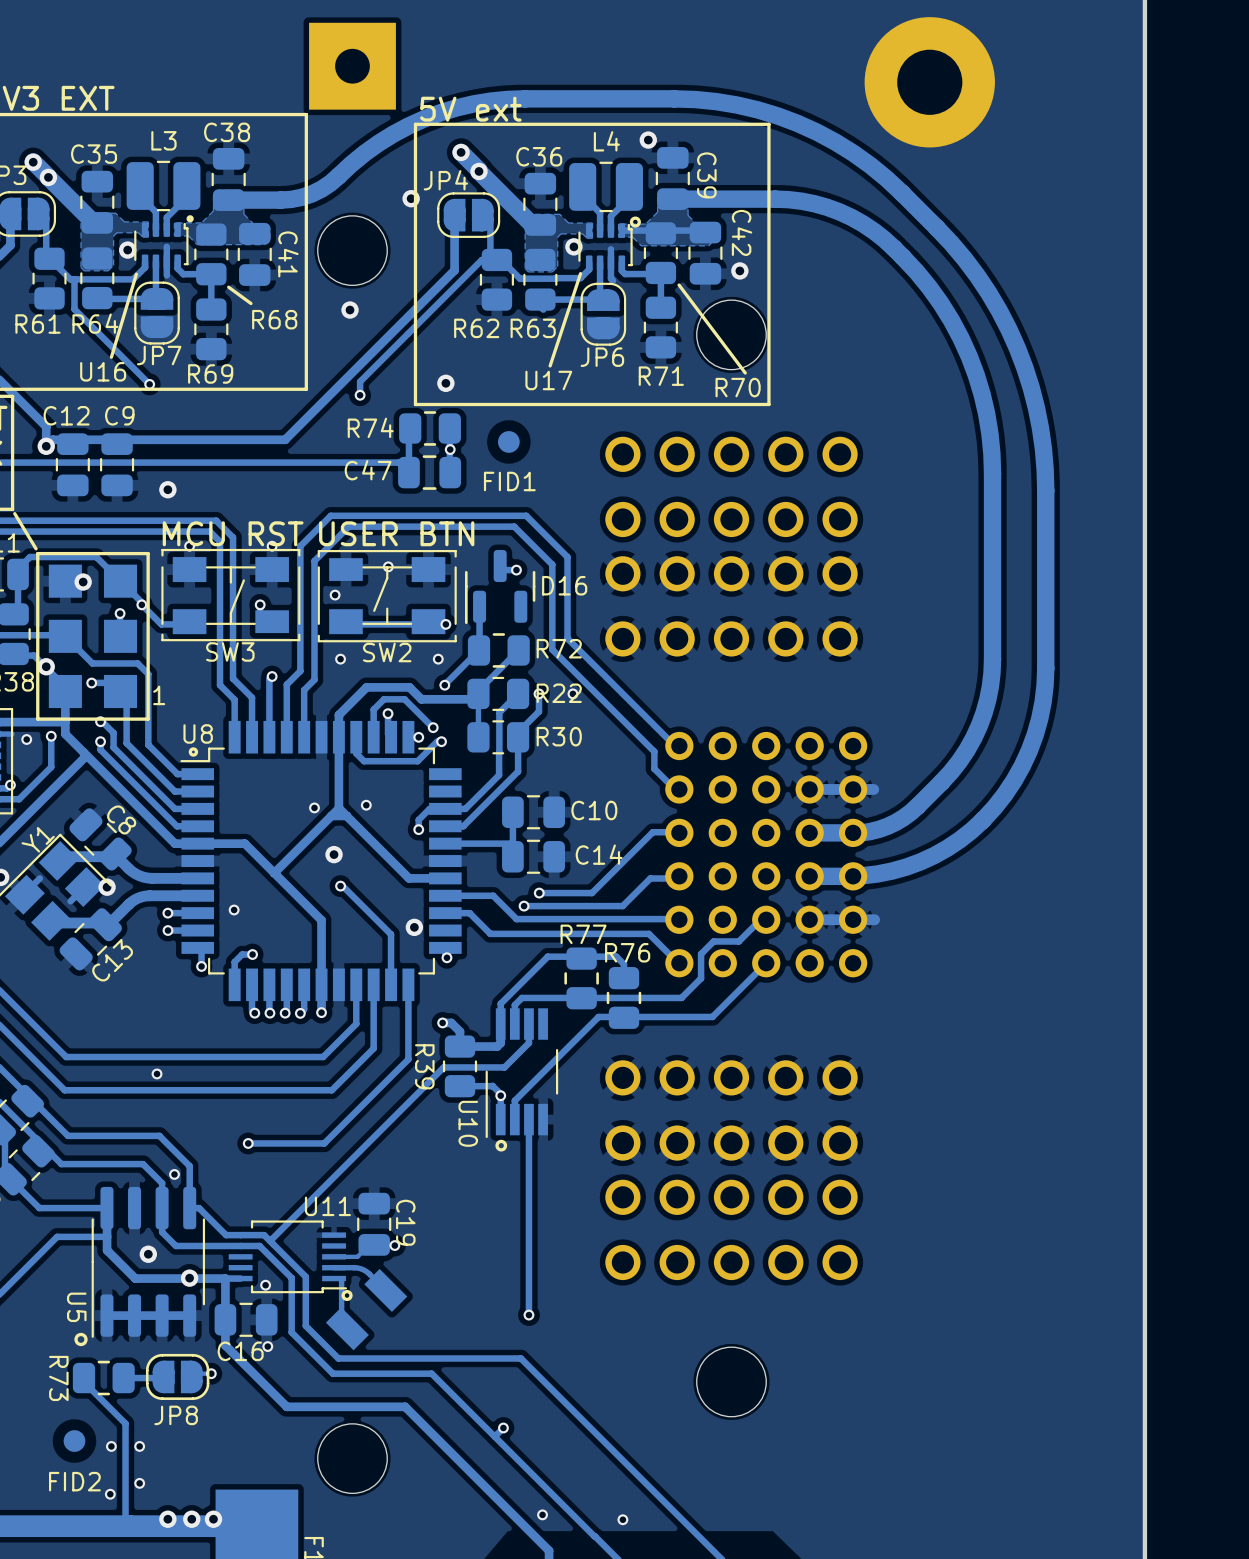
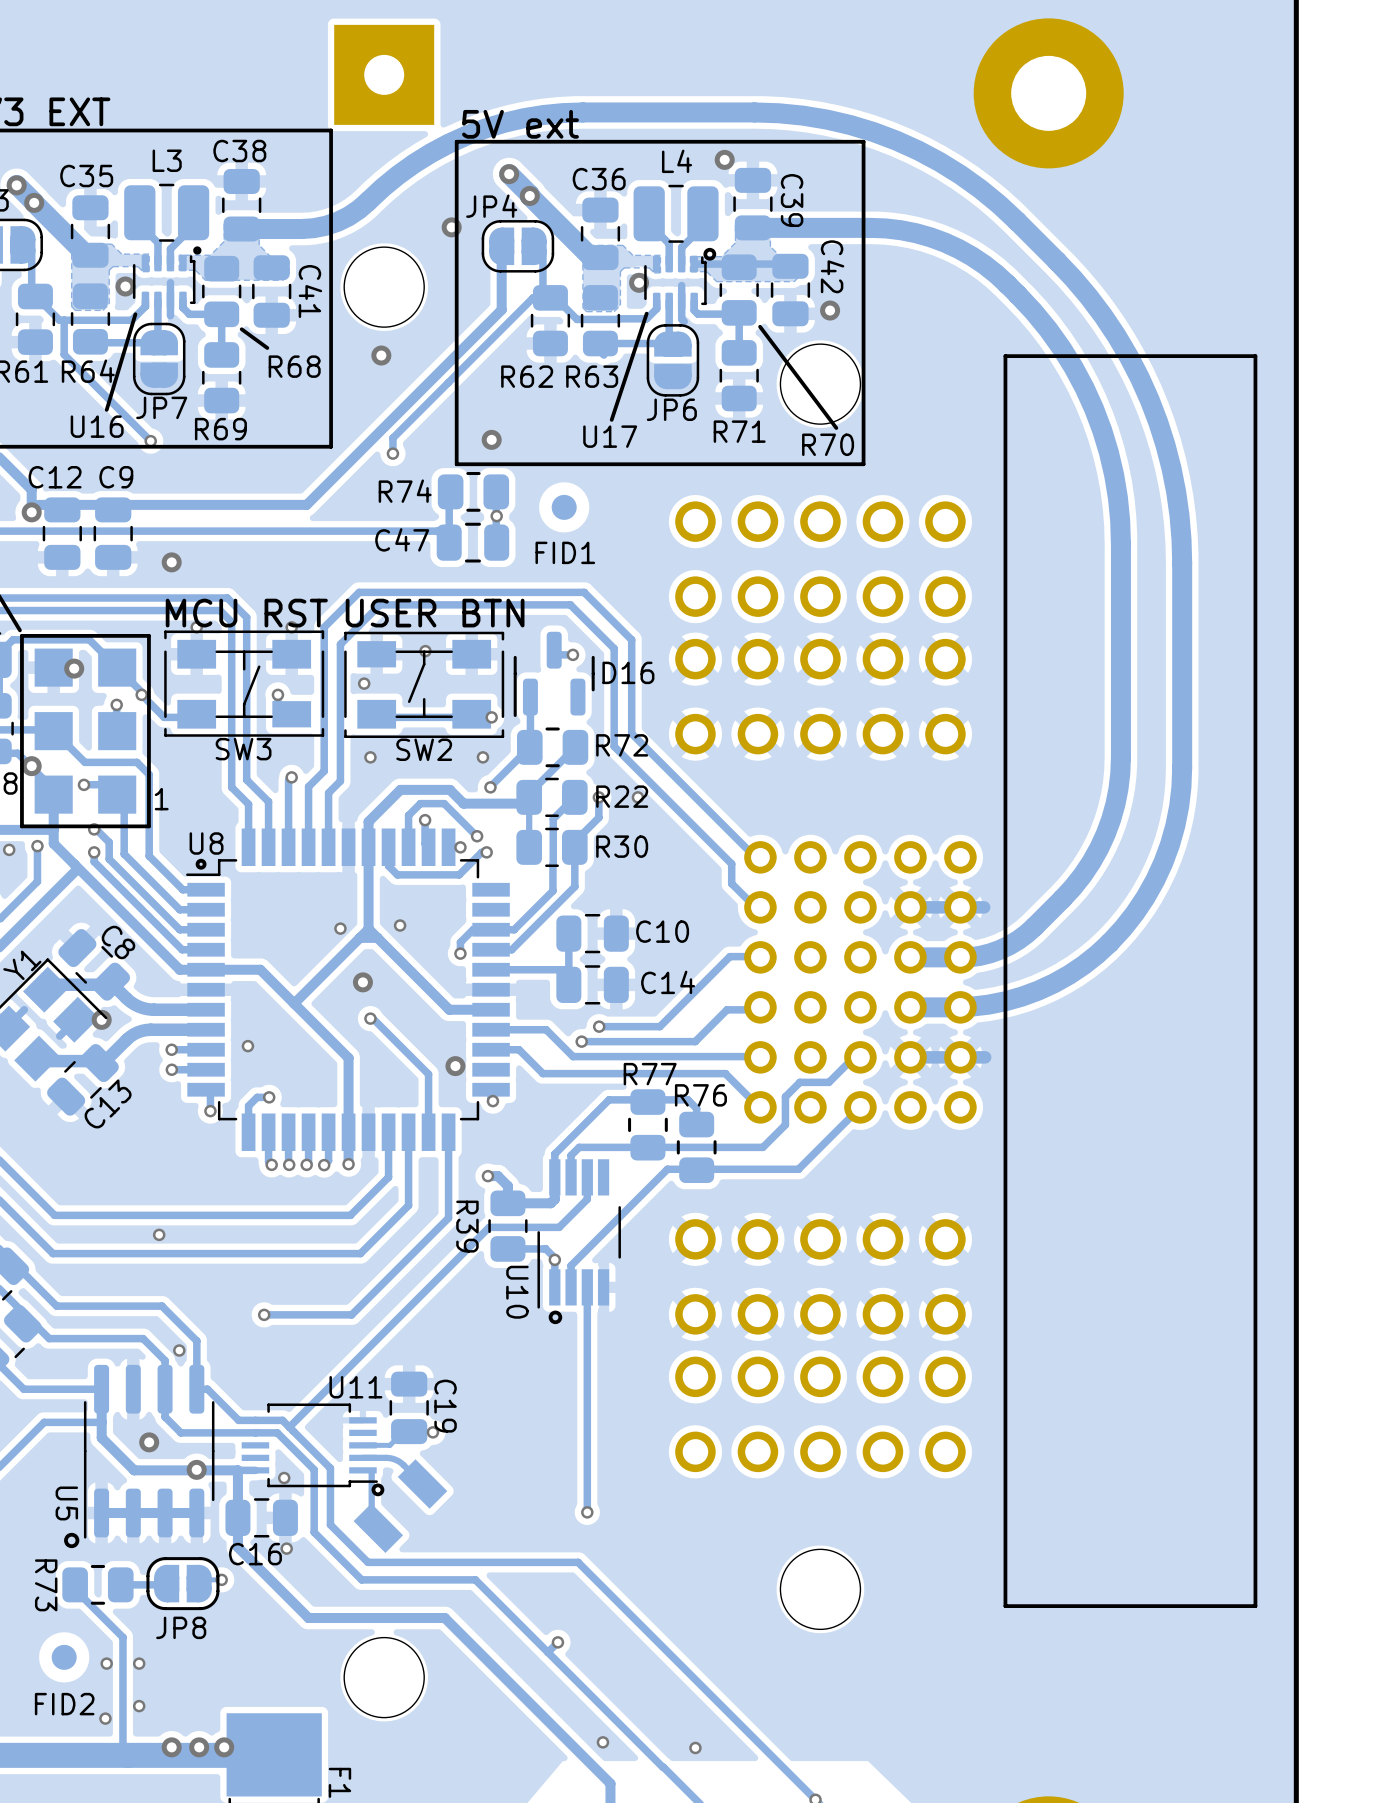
line: none -> (1255, 356) (1005, 356) (1005, 1606) (1255, 1606) (1255, 356)

